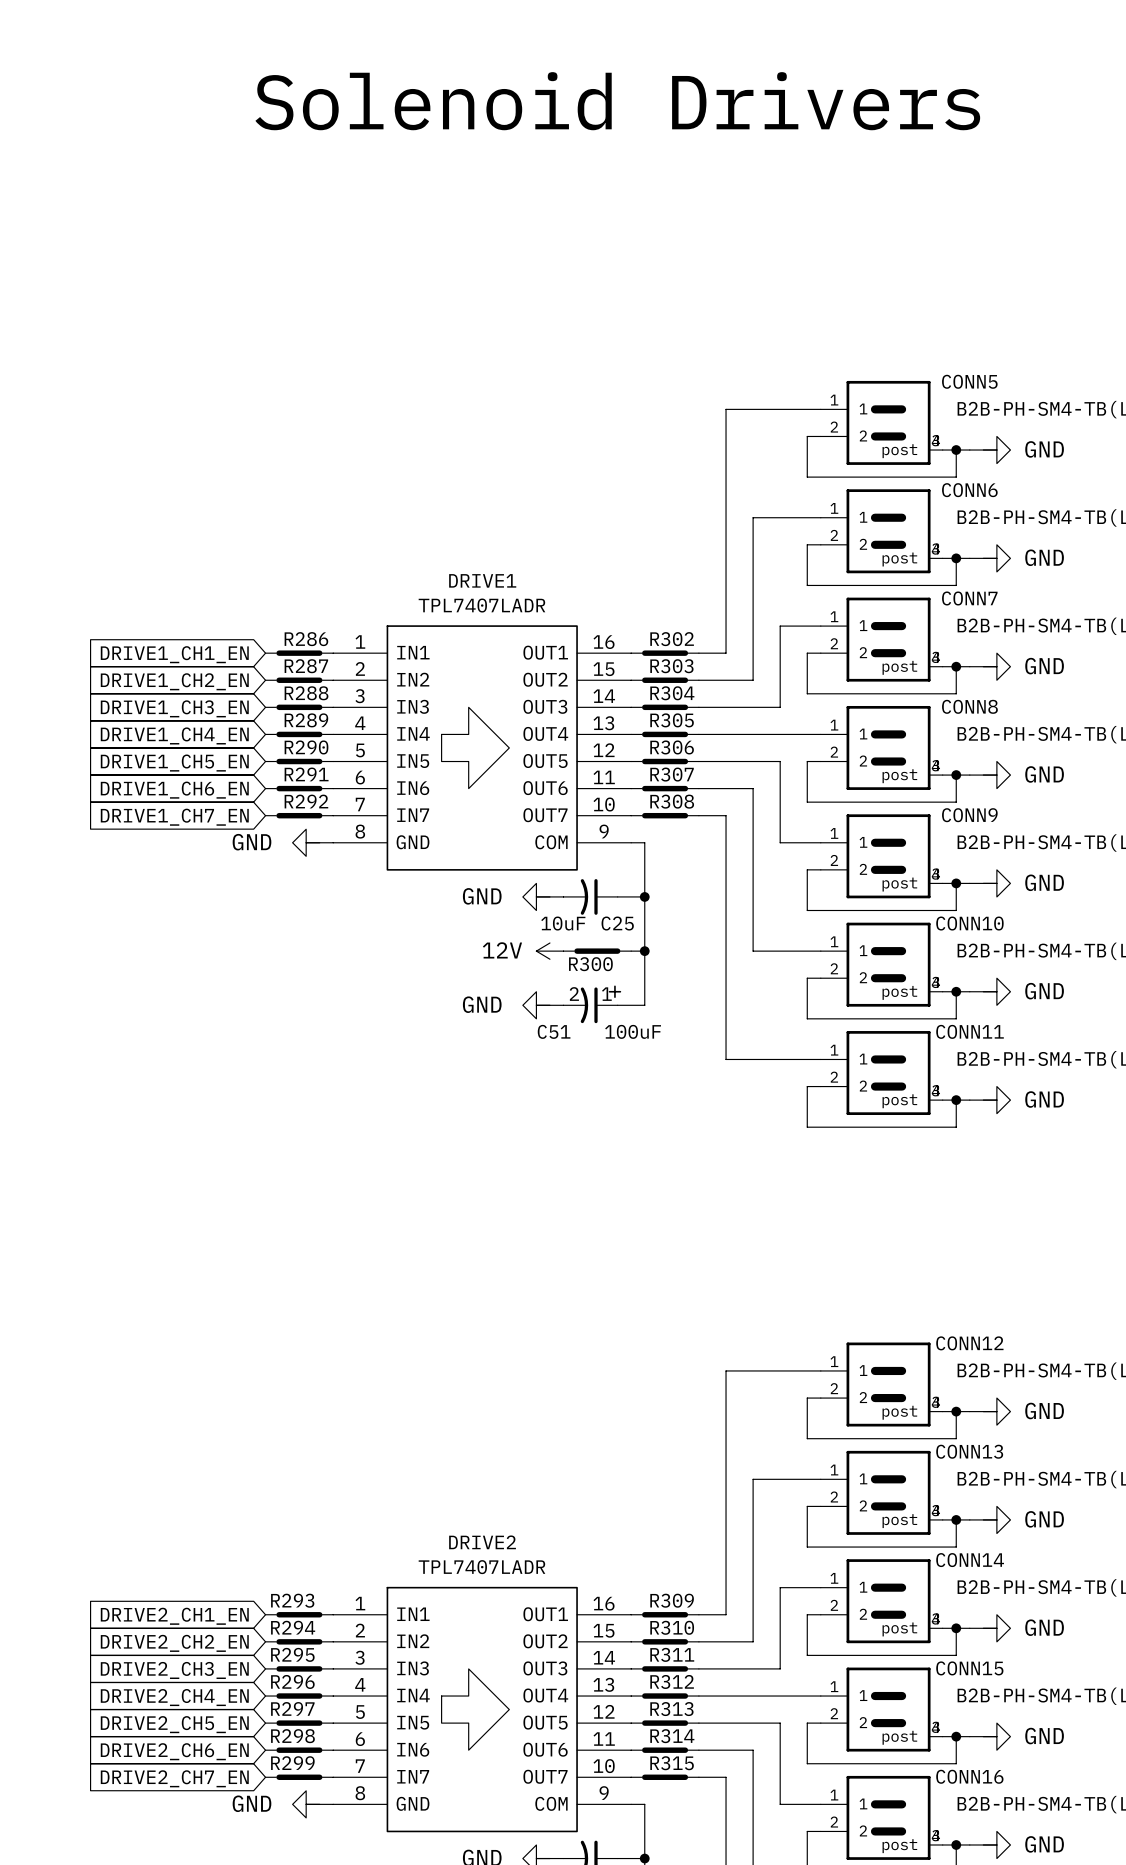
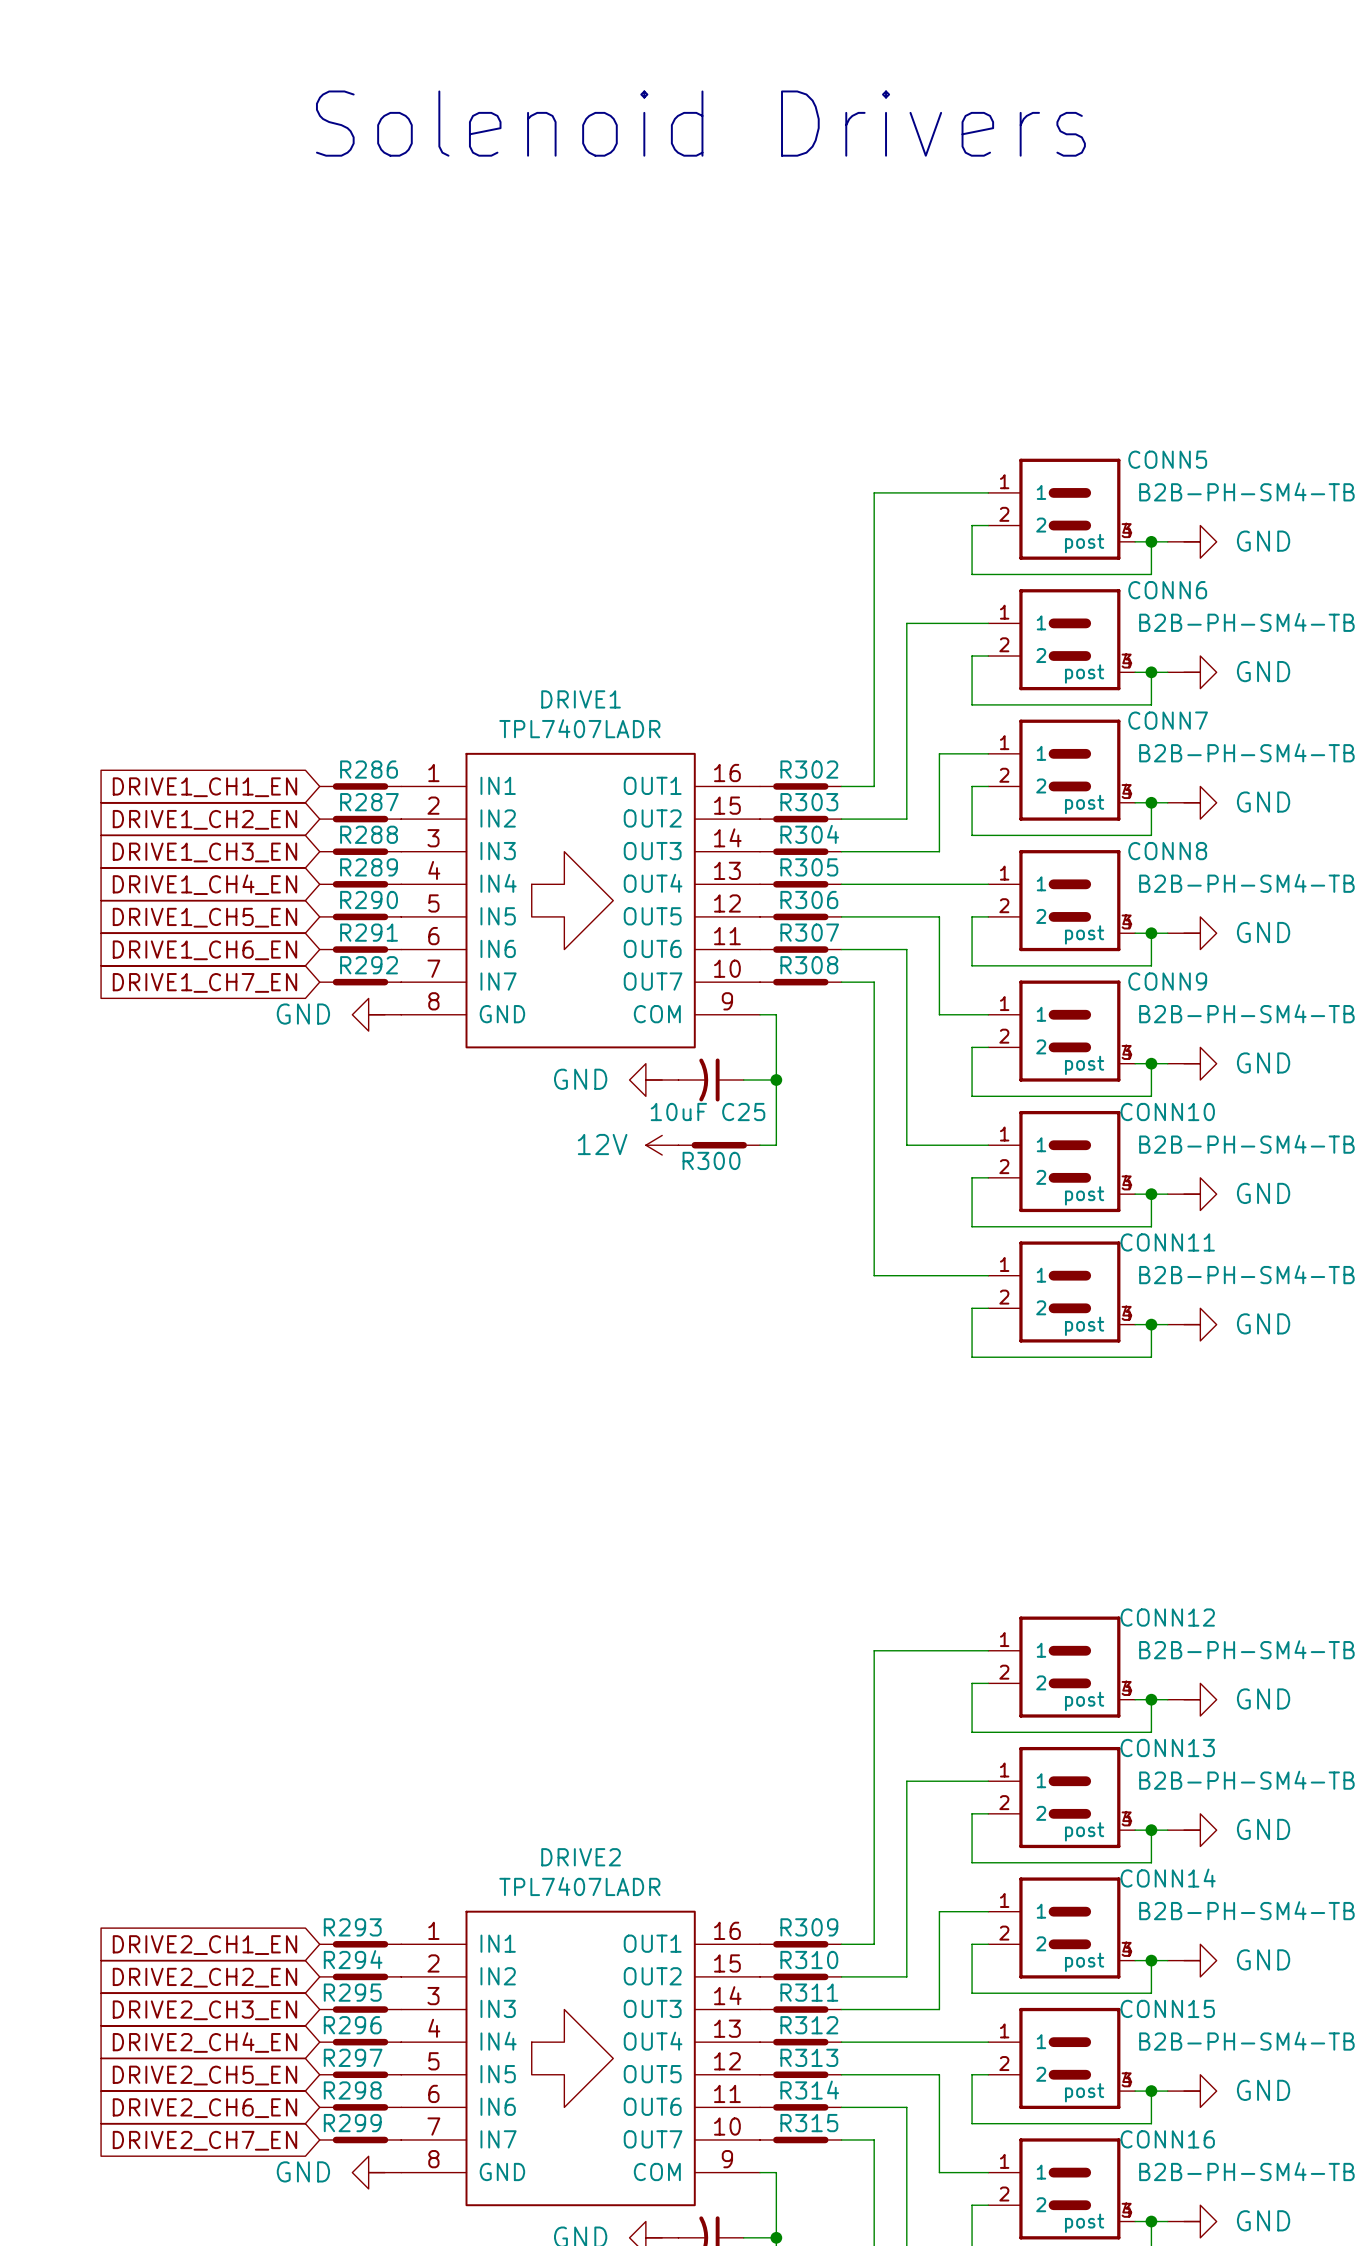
wire: (644, 951) (644, 1005) (617, 1005) -> none
junction: (644, 951) -> none
C51: (592, 1004) -> none
power symbol: GND (543, 1005) -> none

